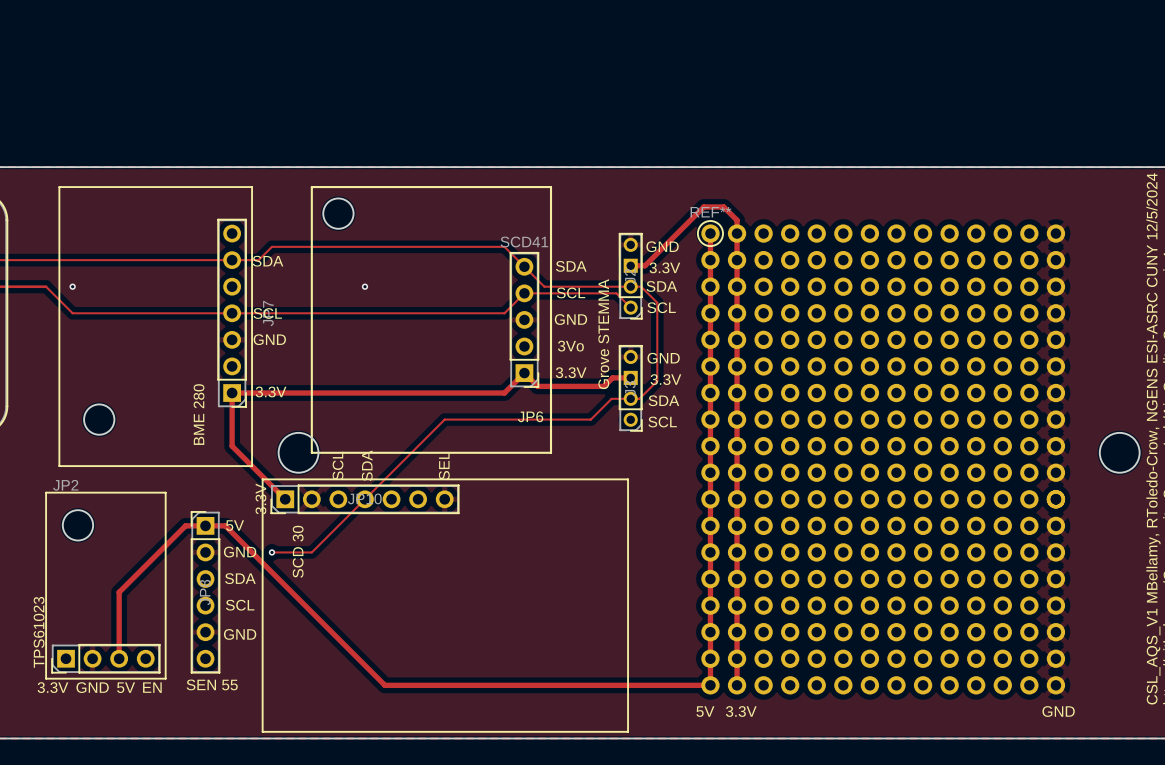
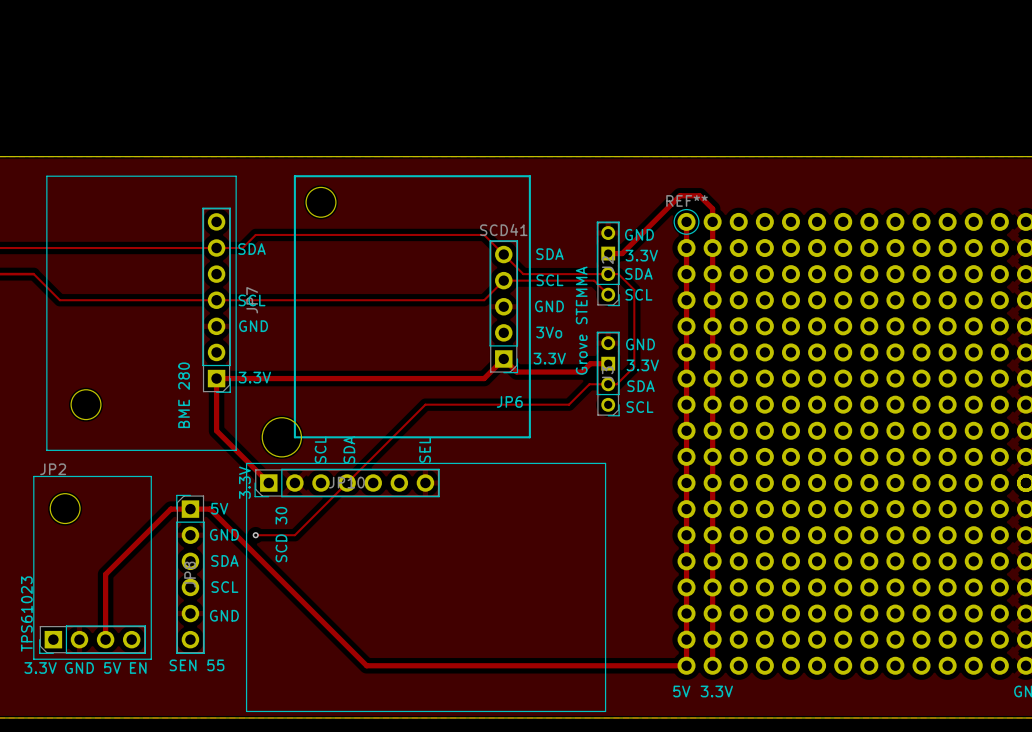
via: (72, 286) -> none
via: (364, 286) -> none

